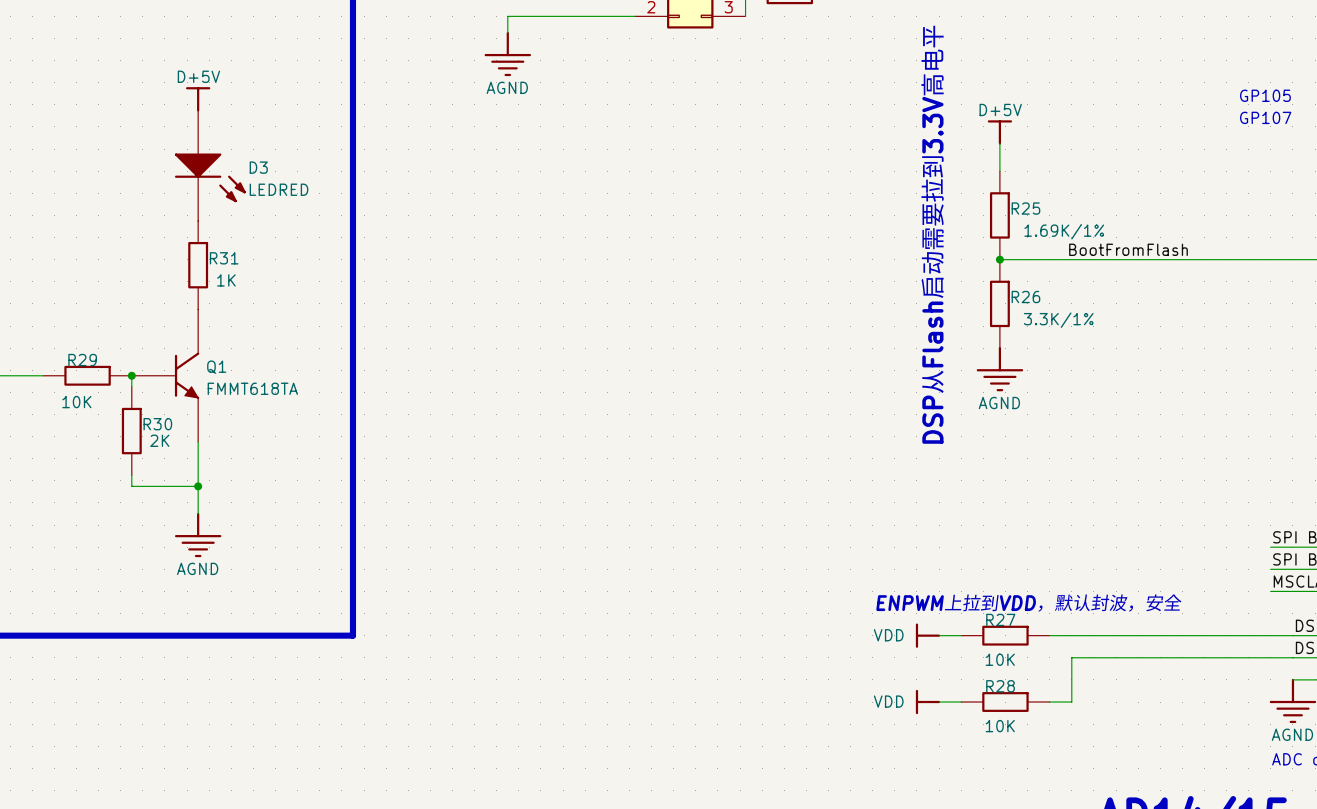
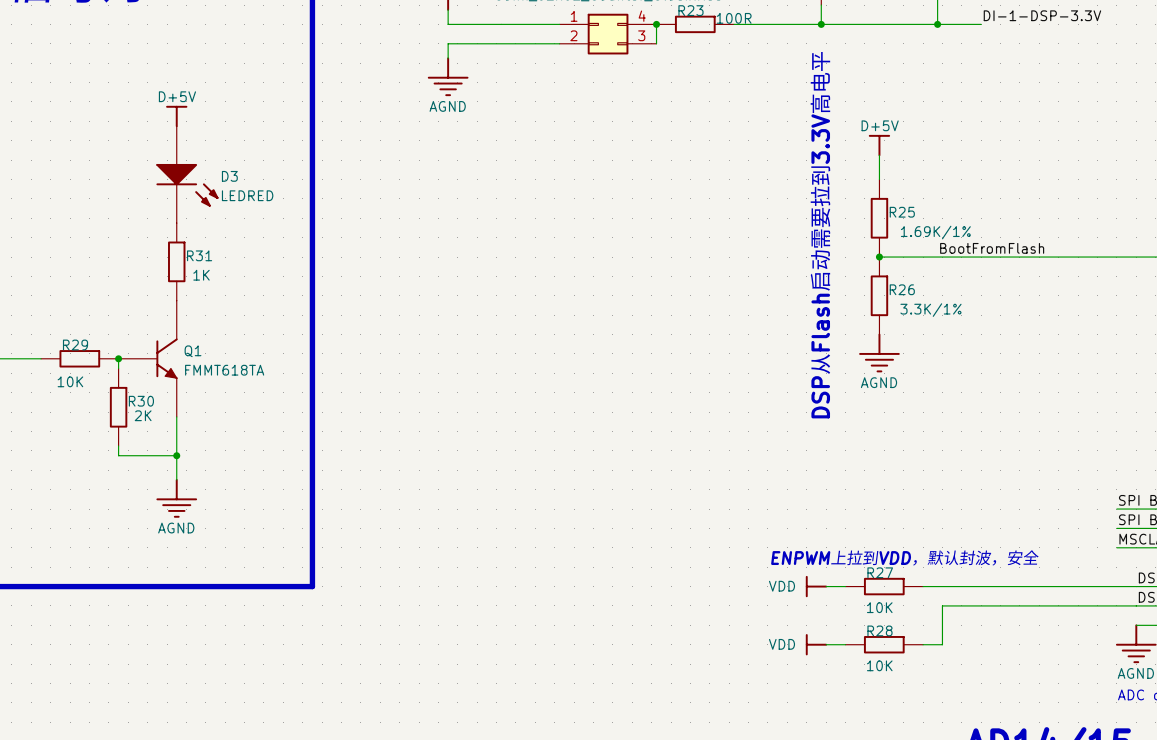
text: GP105 (1265, 95) -> none
text: GP107 (1265, 117) -> none

